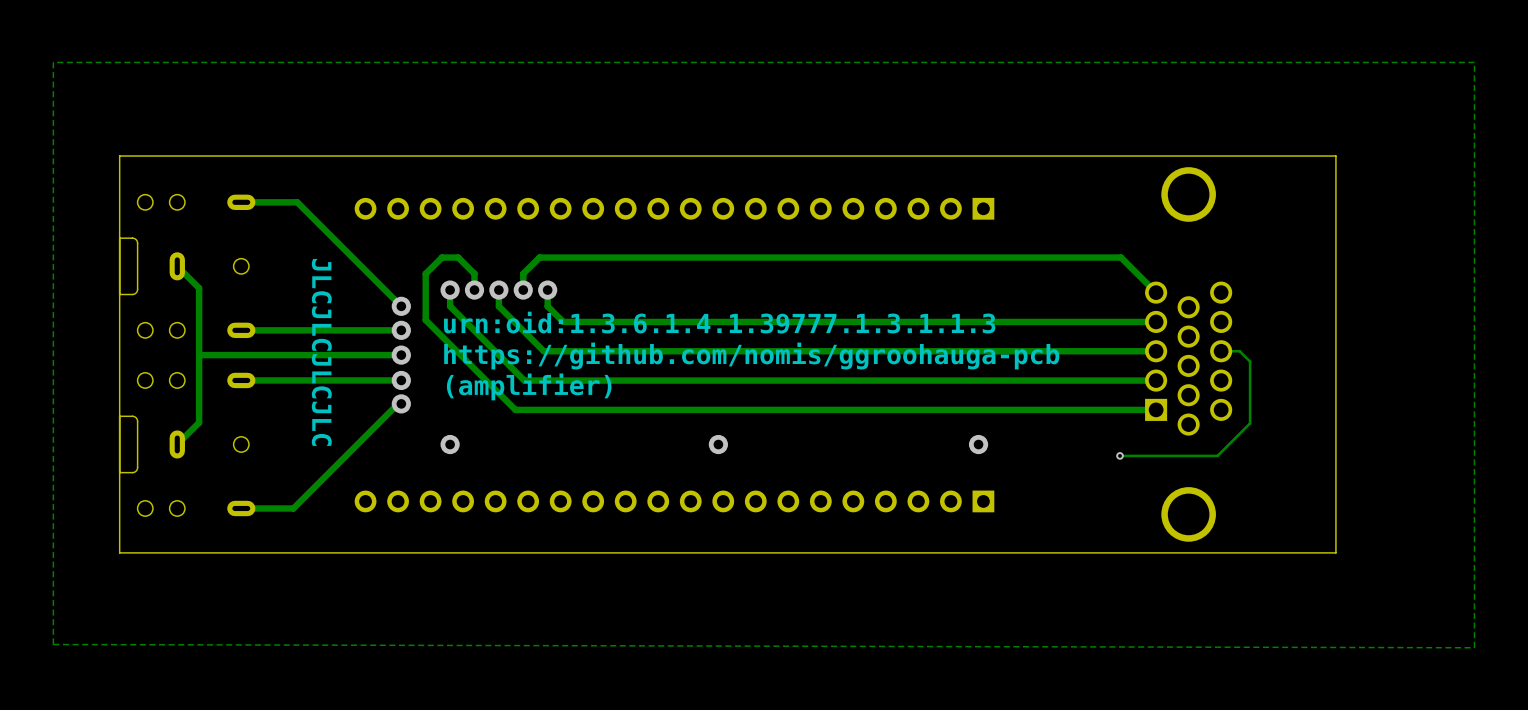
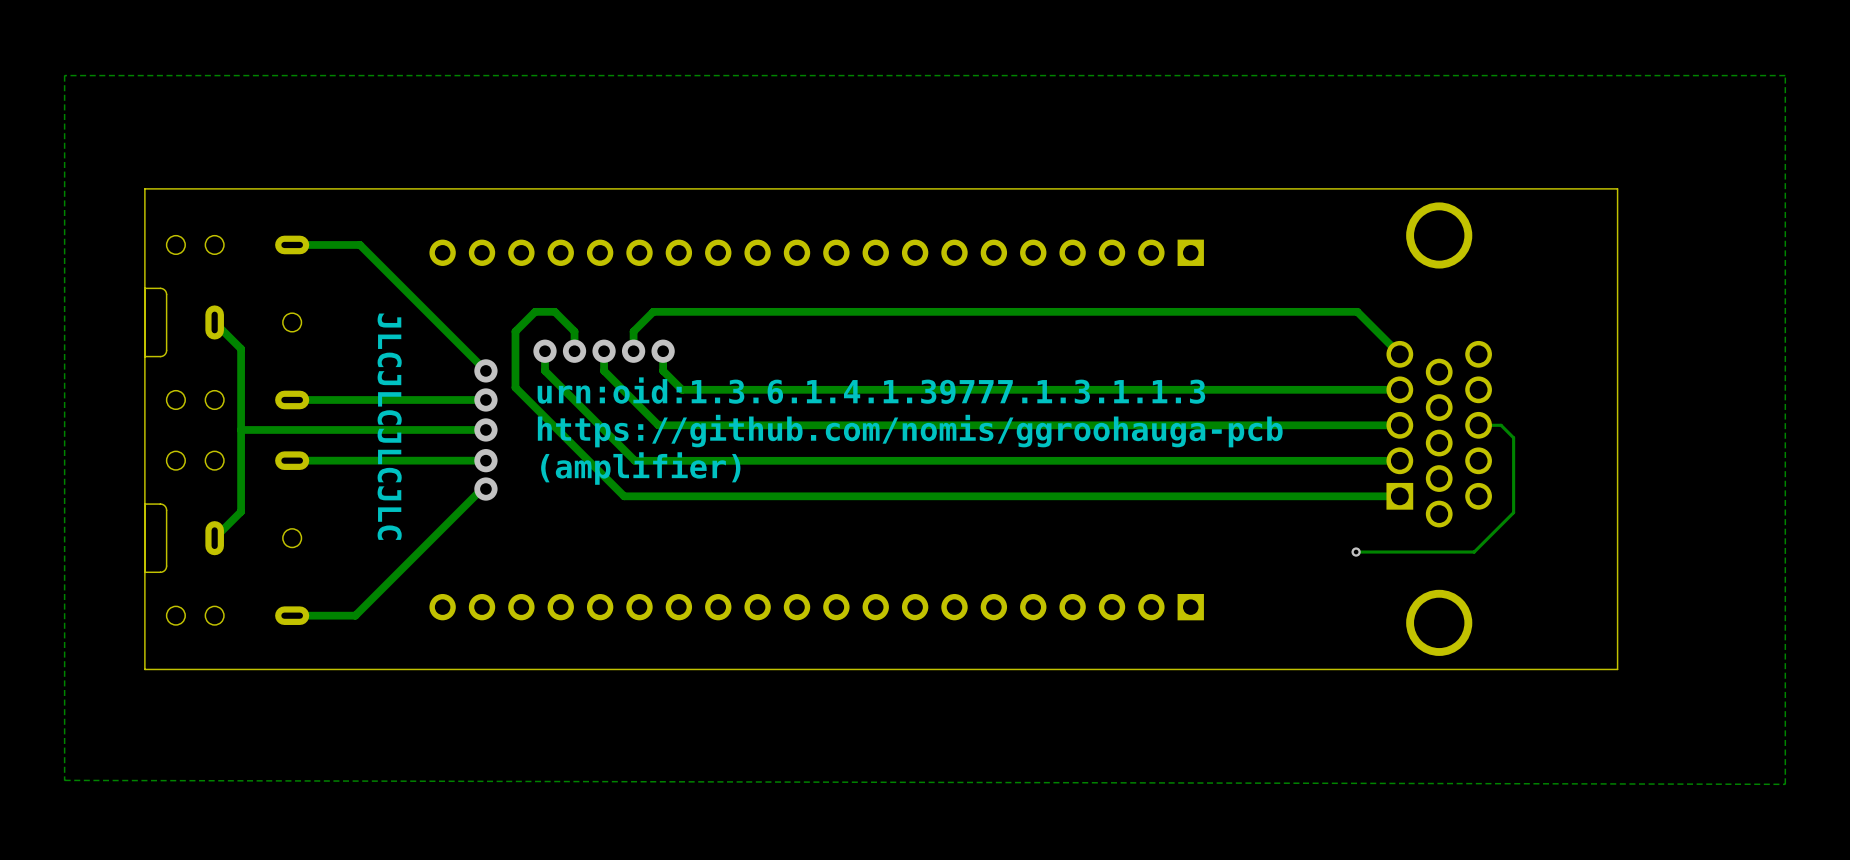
via: (450, 444) -> none
via: (718, 444) -> none
via: (978, 444) -> none

